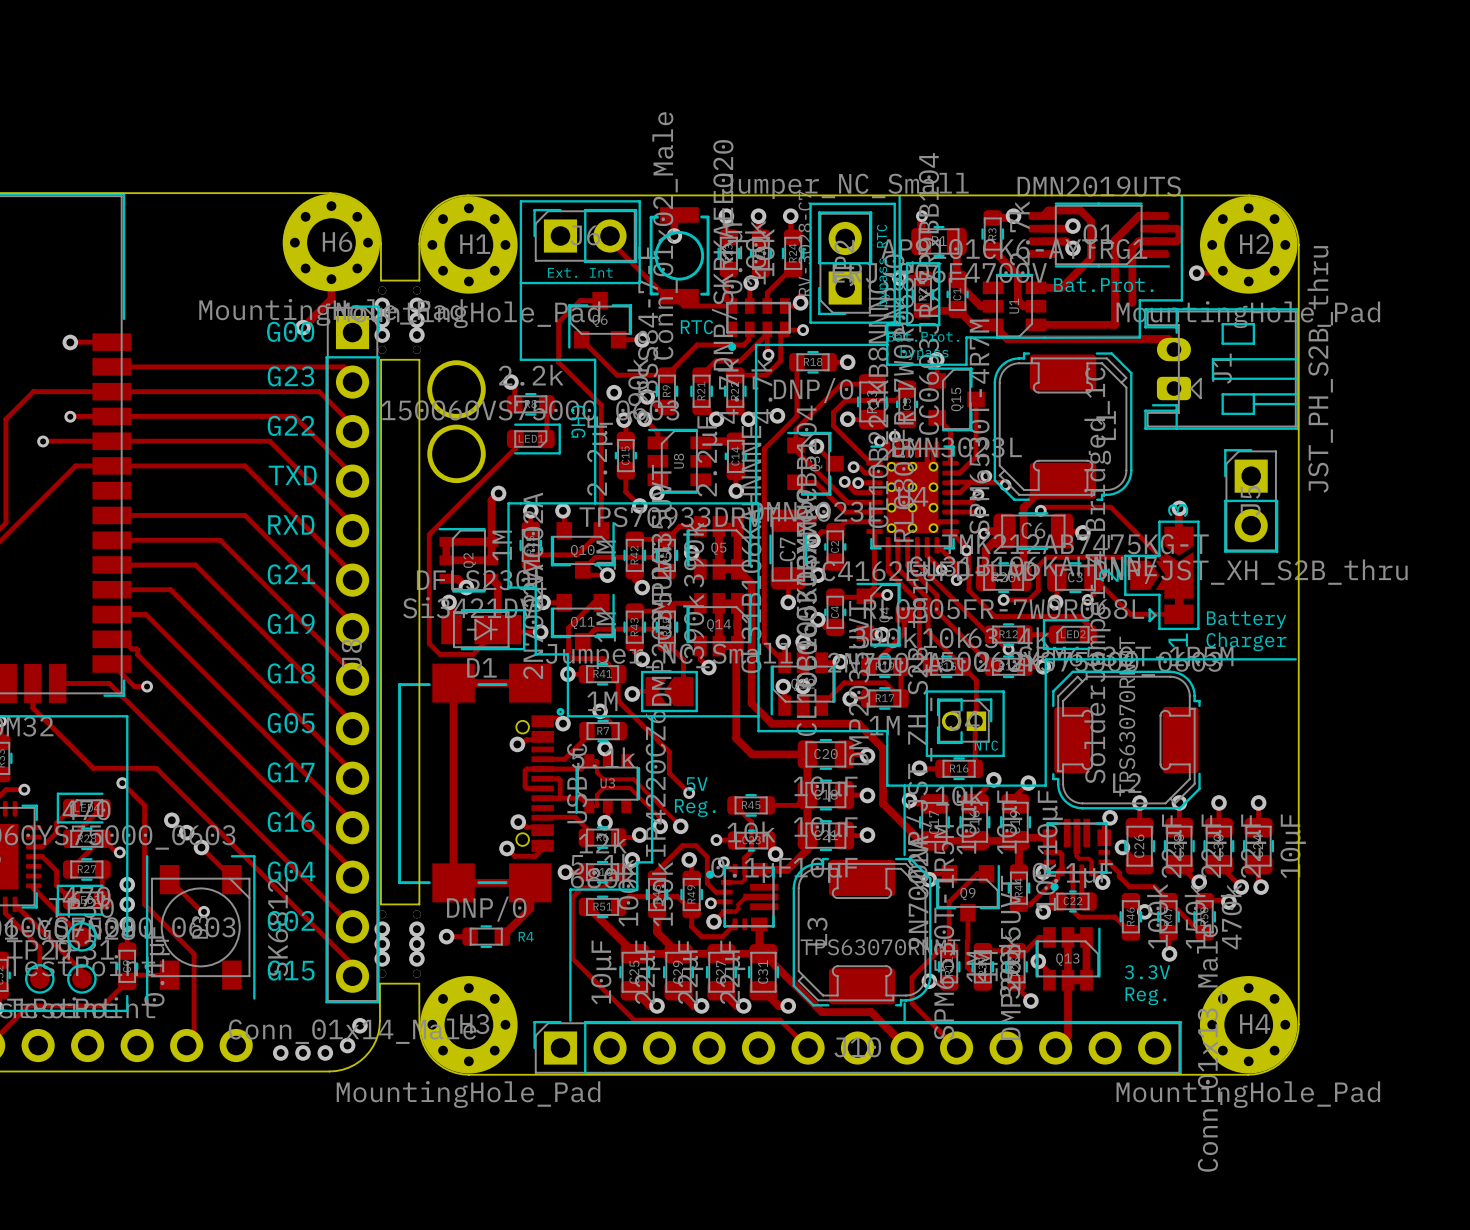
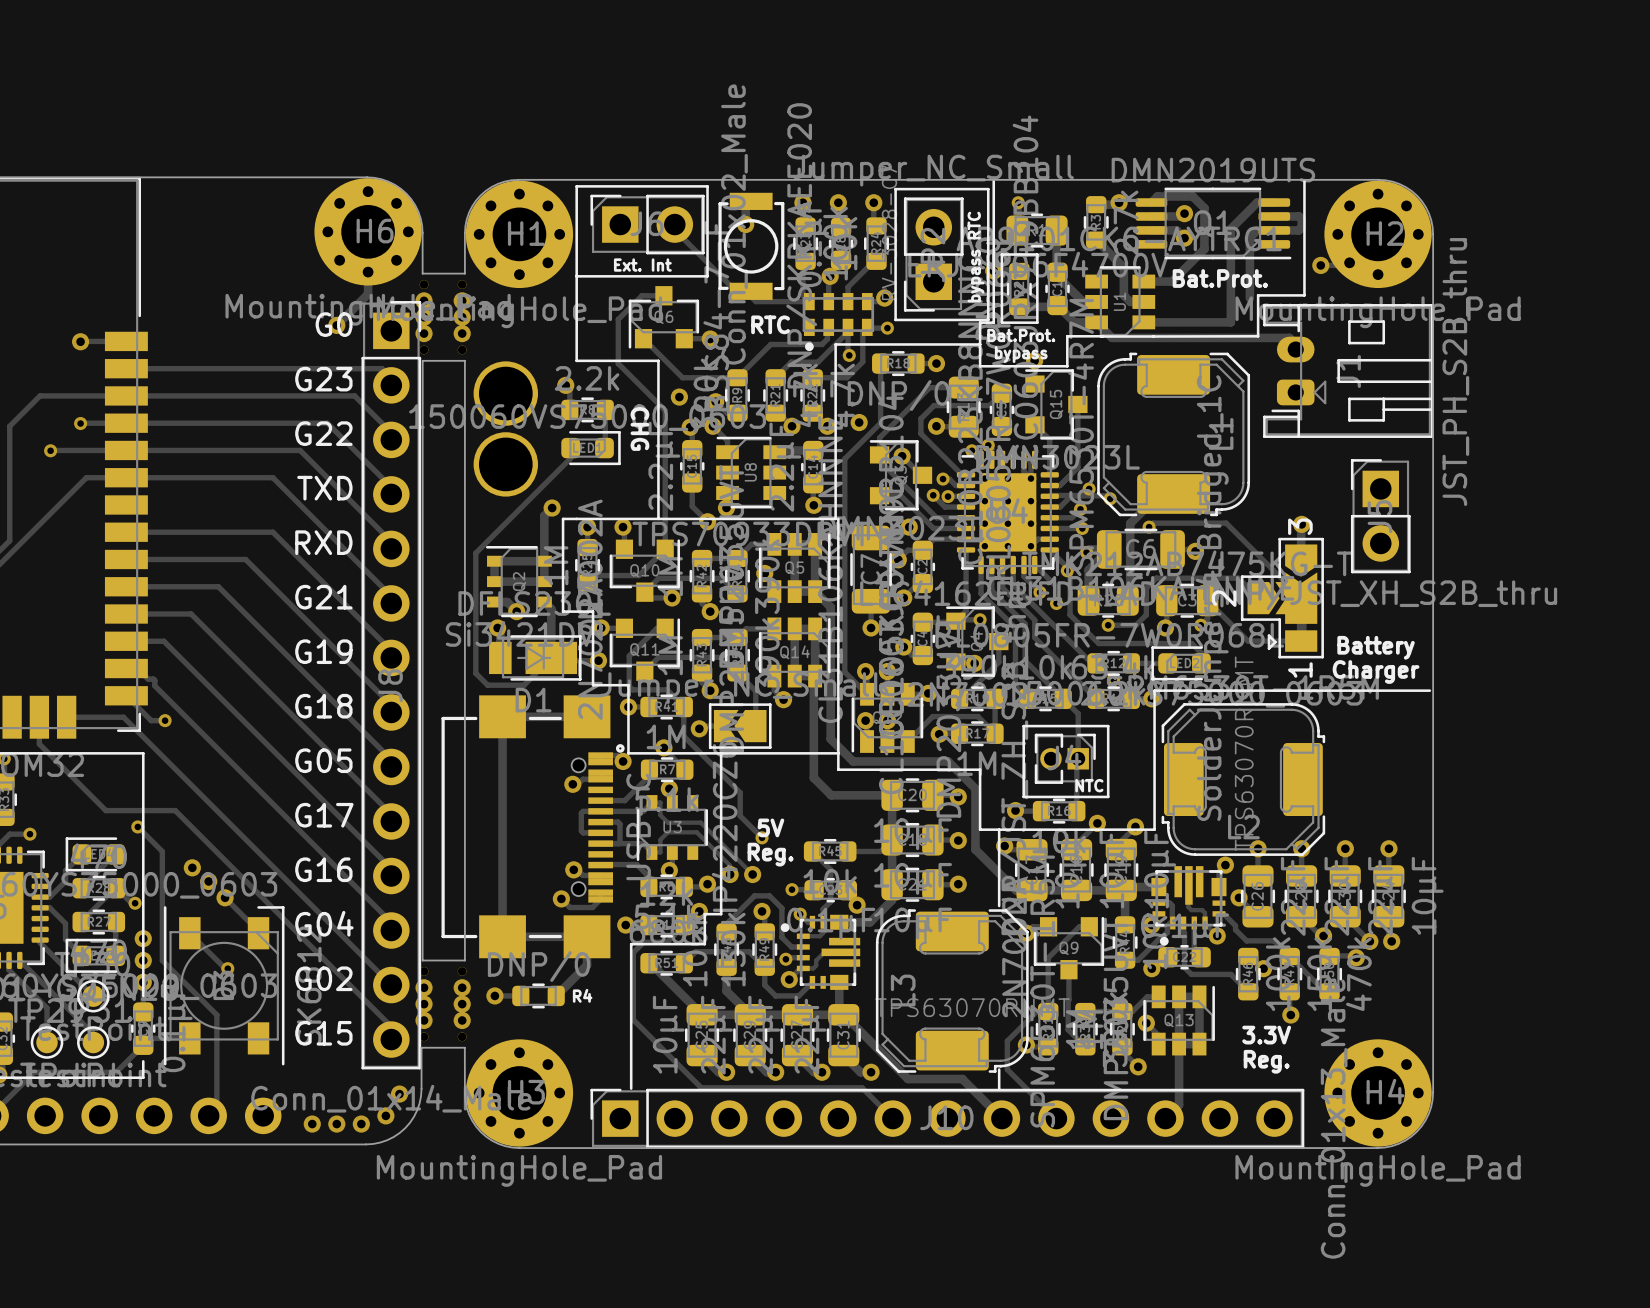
text: G00 (290, 331) -> G0 (334, 324)

